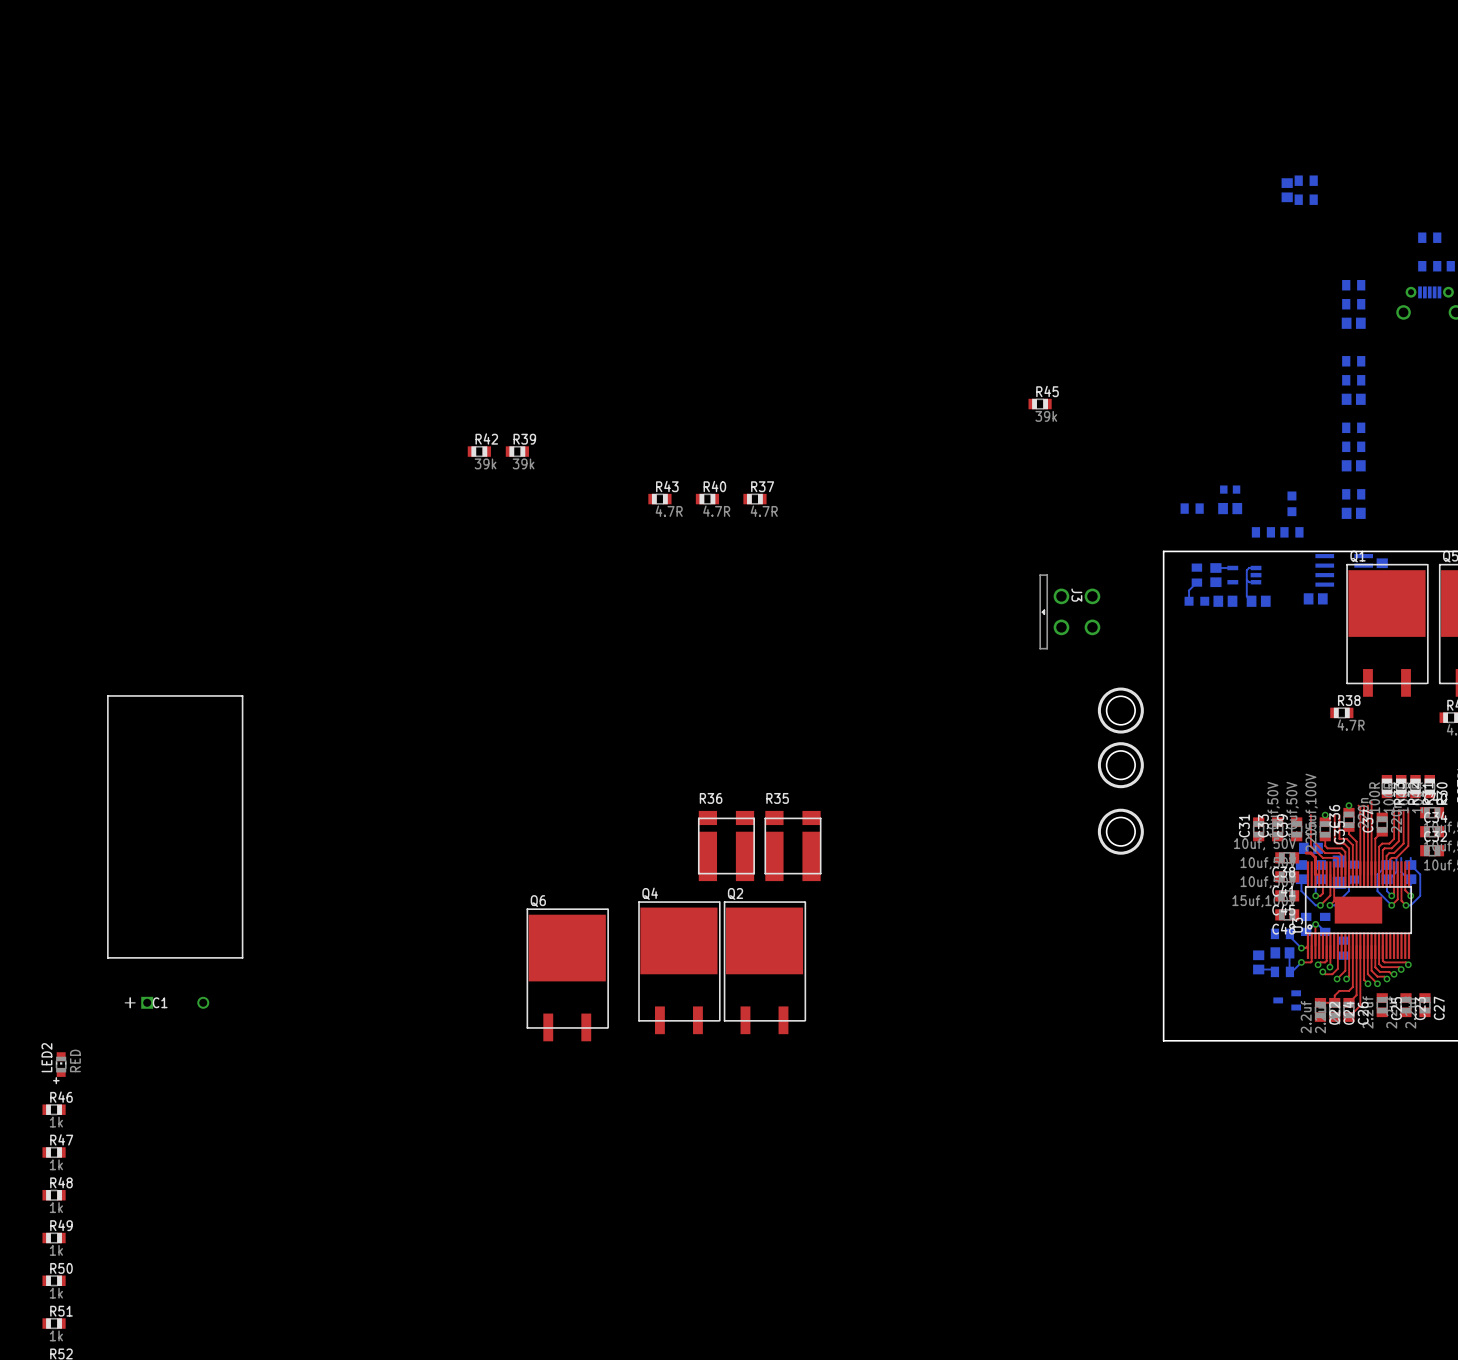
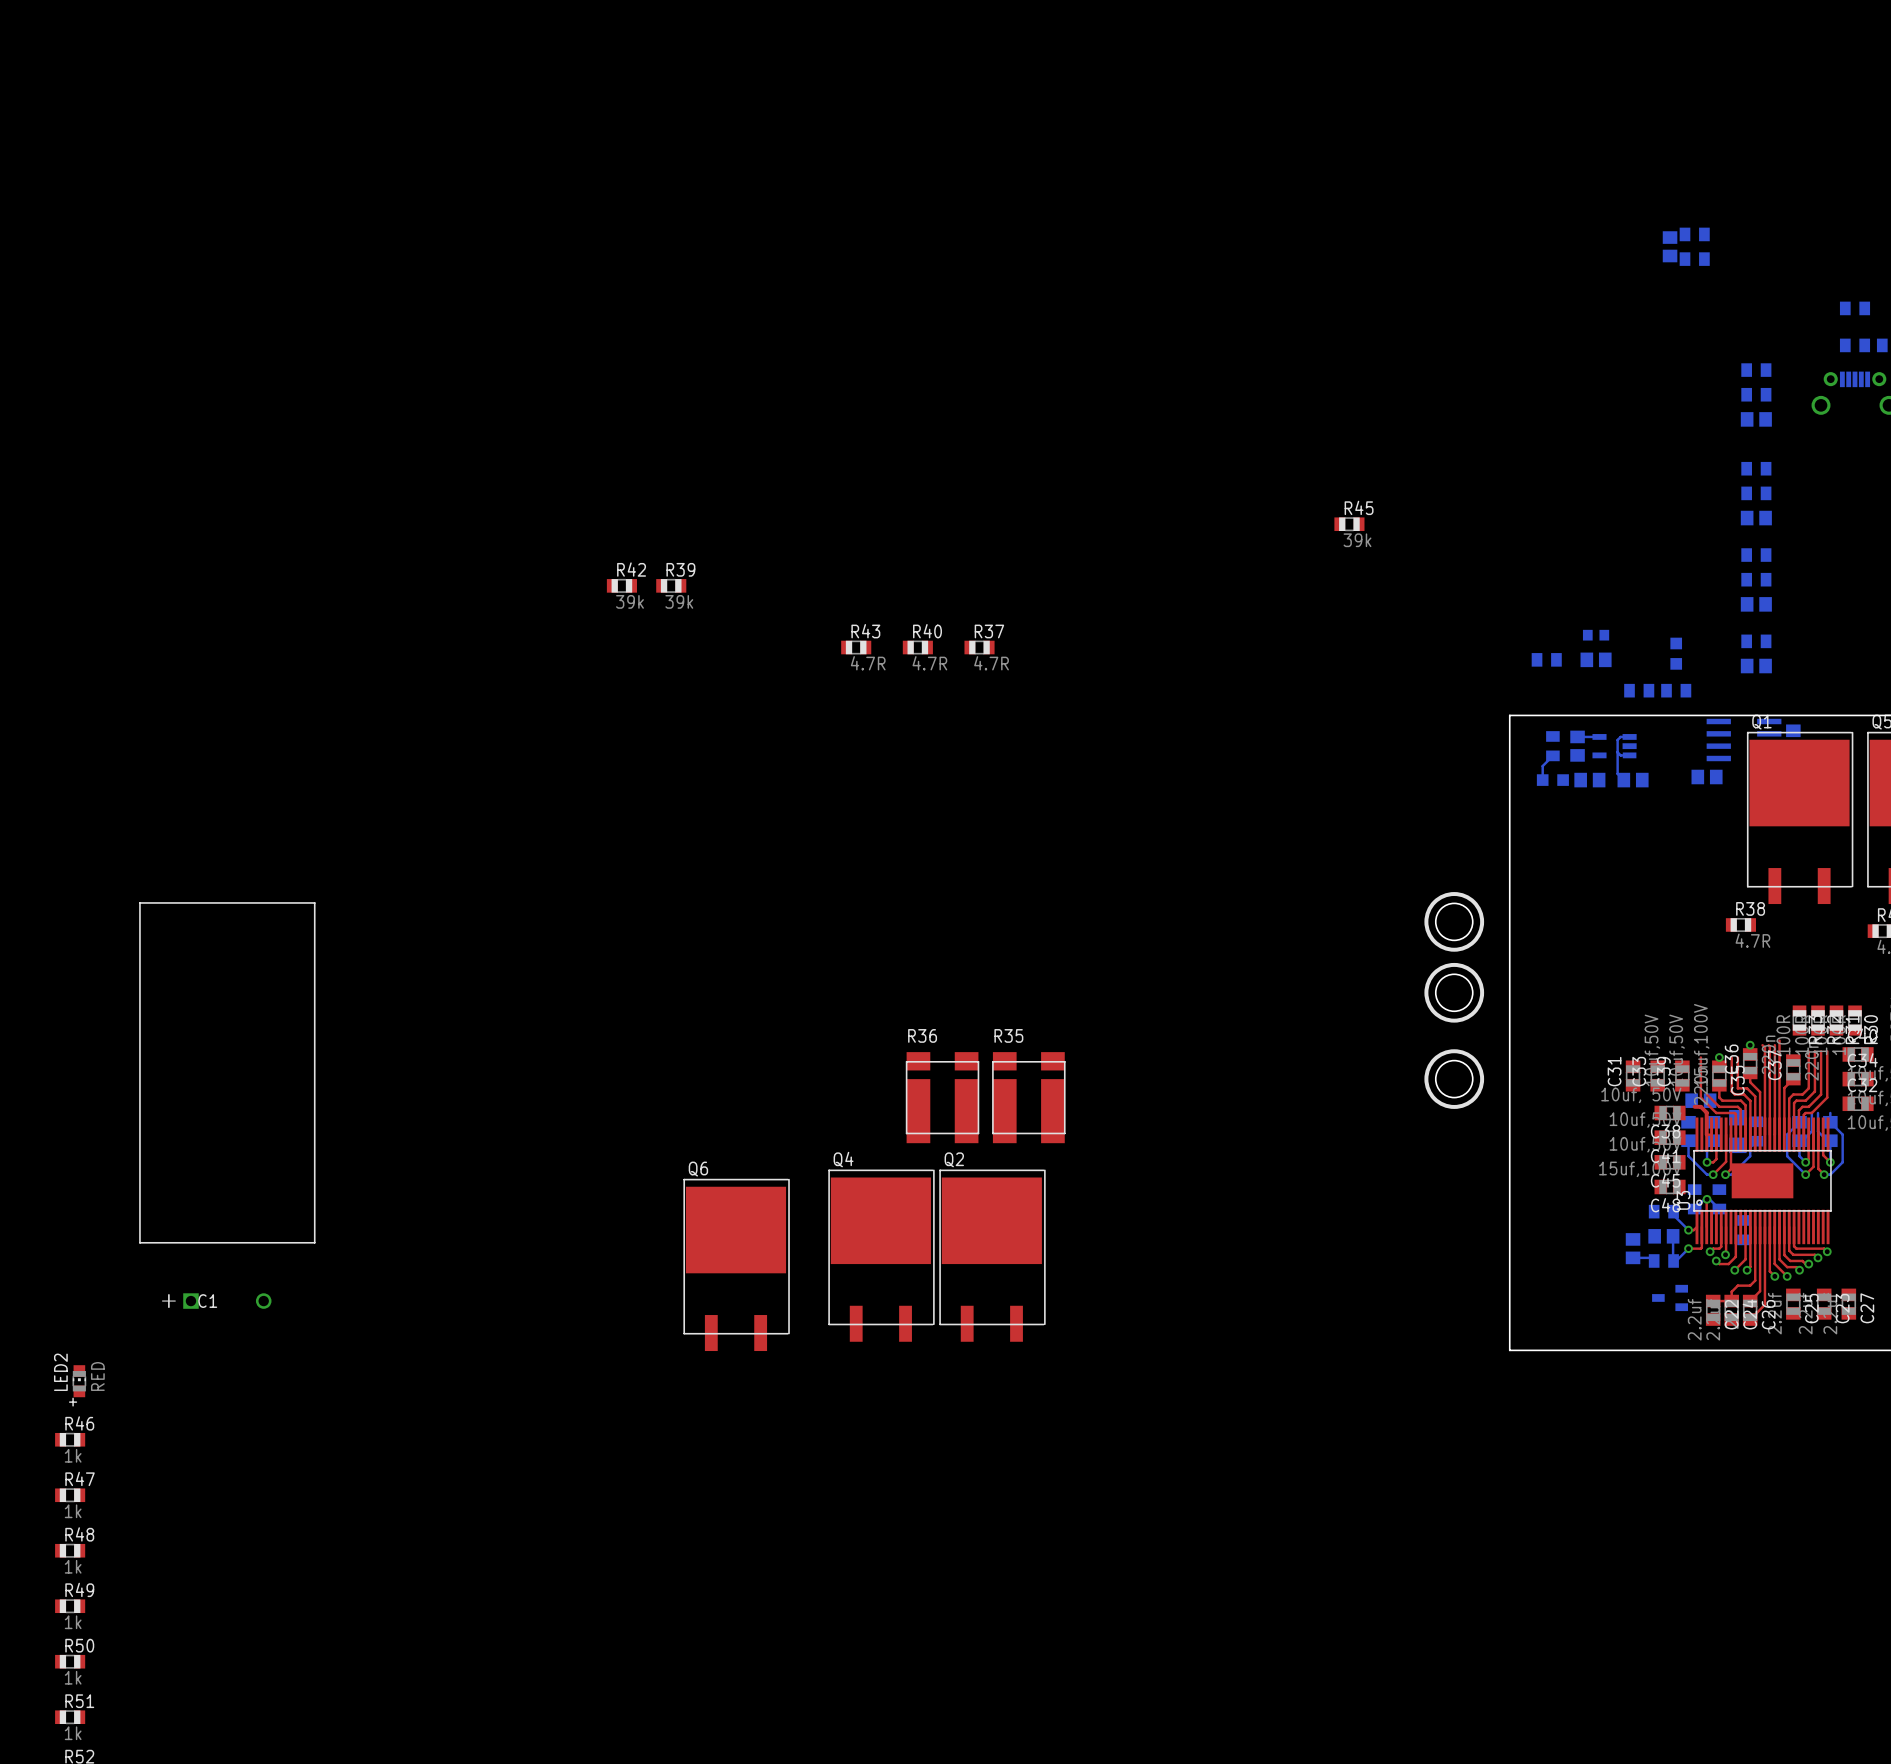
J3: (1069, 611) -> none

